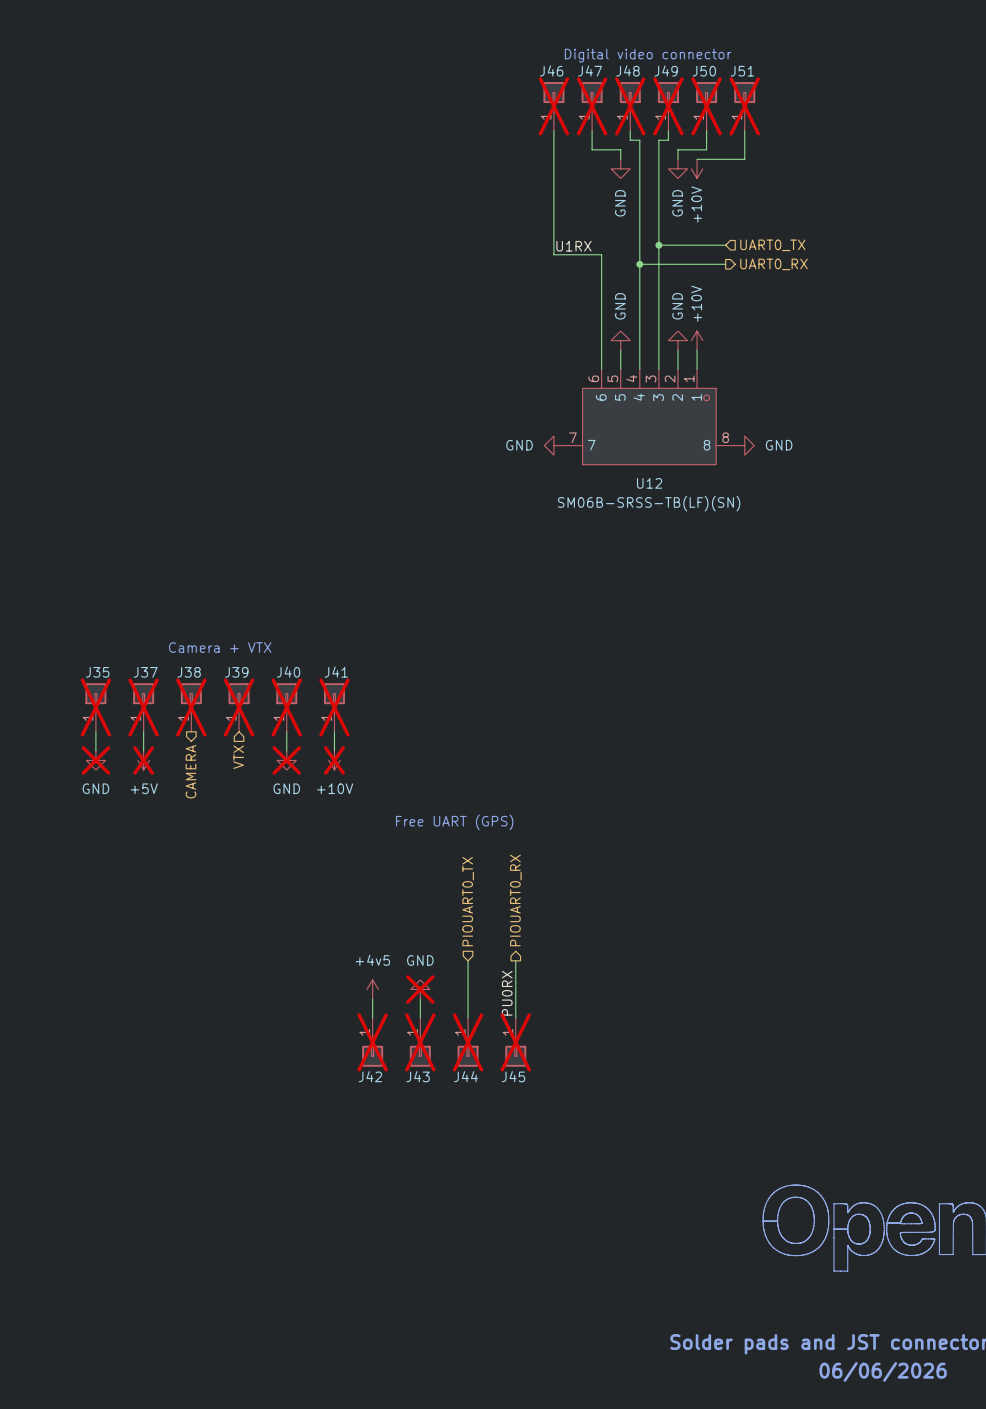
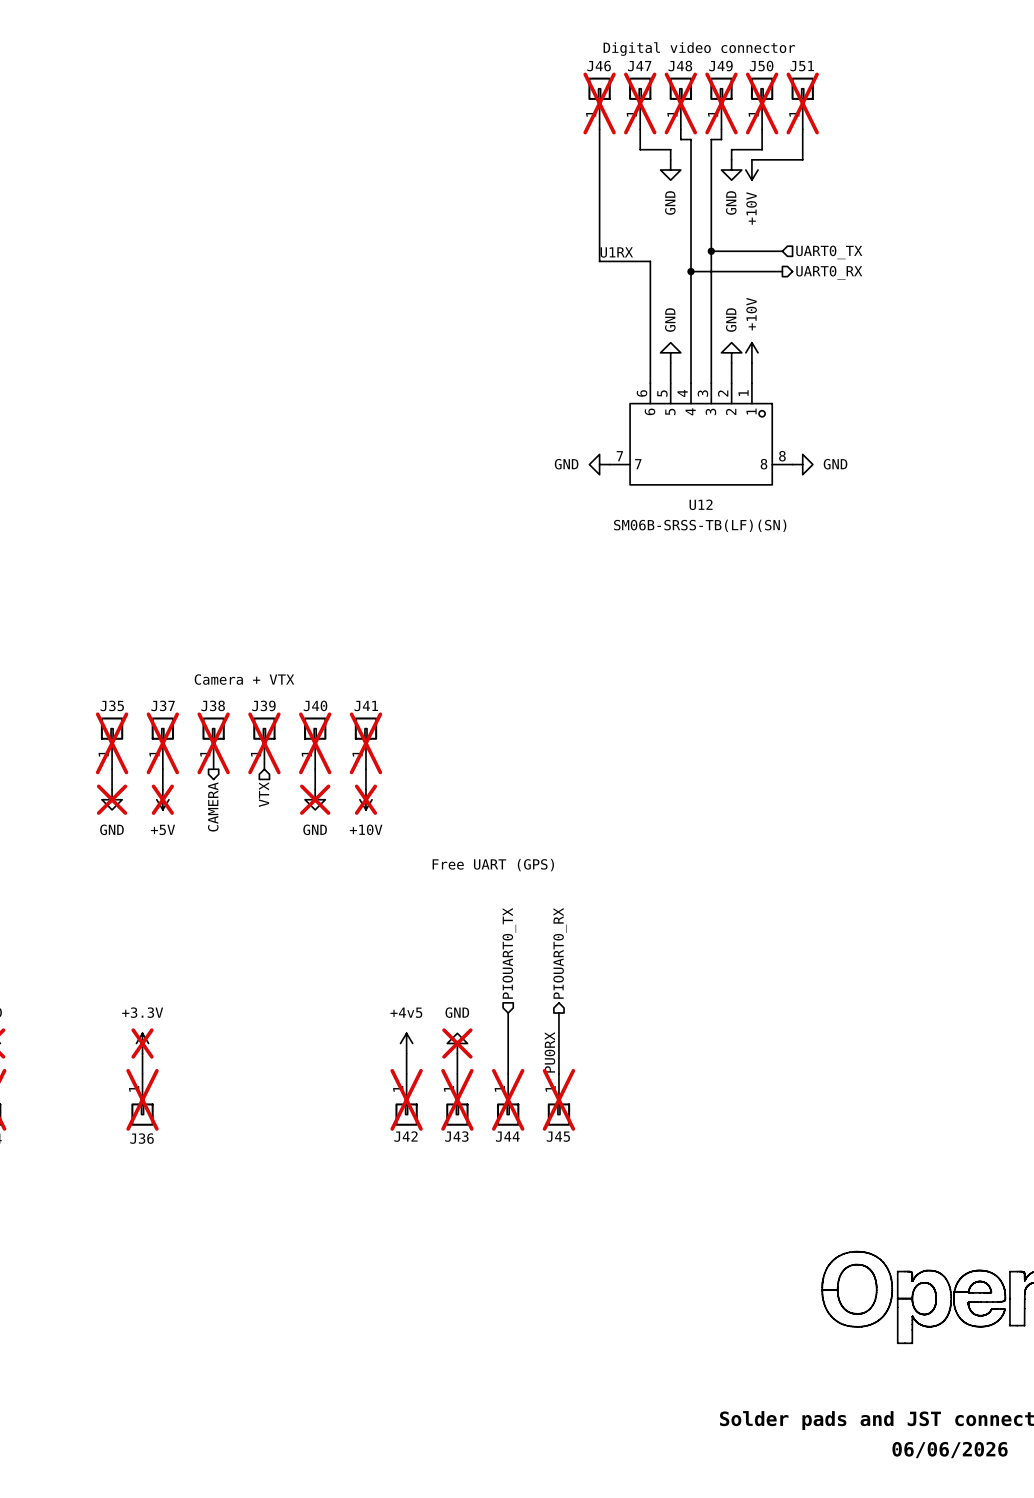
power symbol: none -> +3.3V (142, 1043)
wire: none -> (142, 1053) (142, 1073)
J36: none -> (142, 1099)

